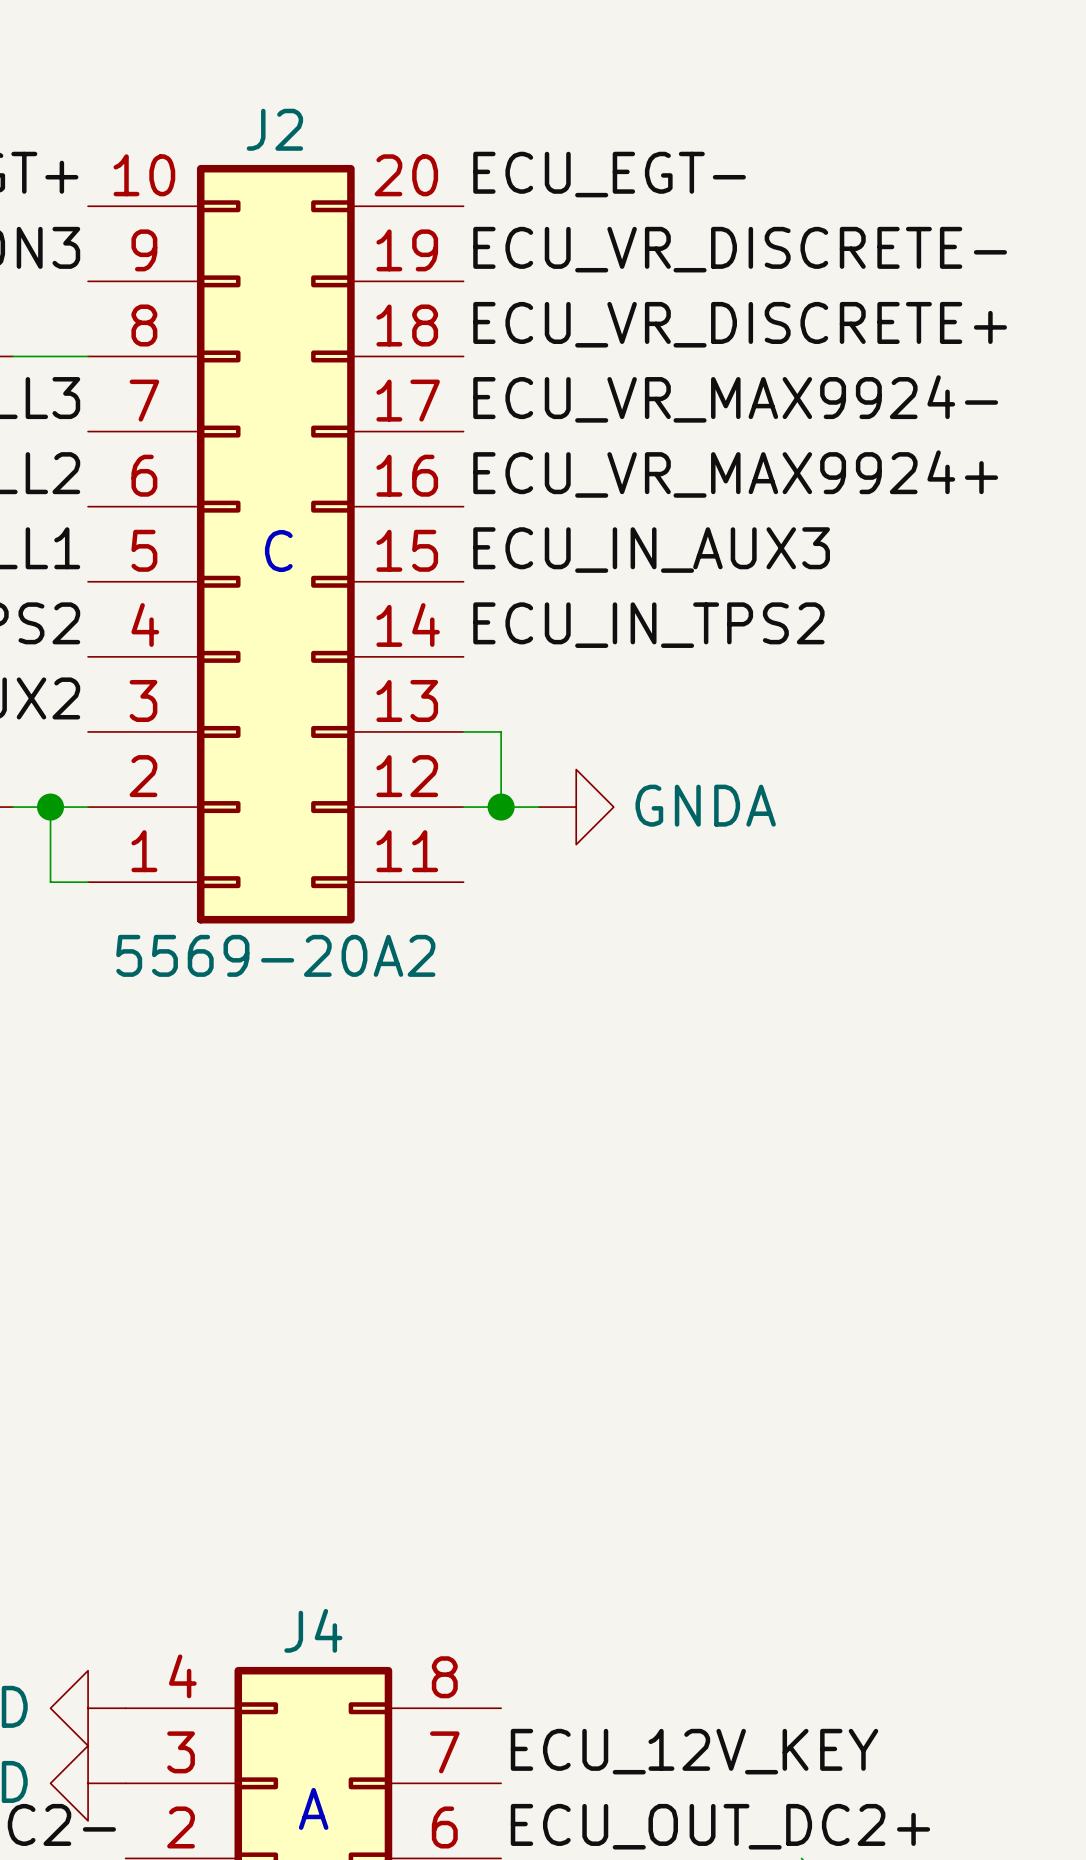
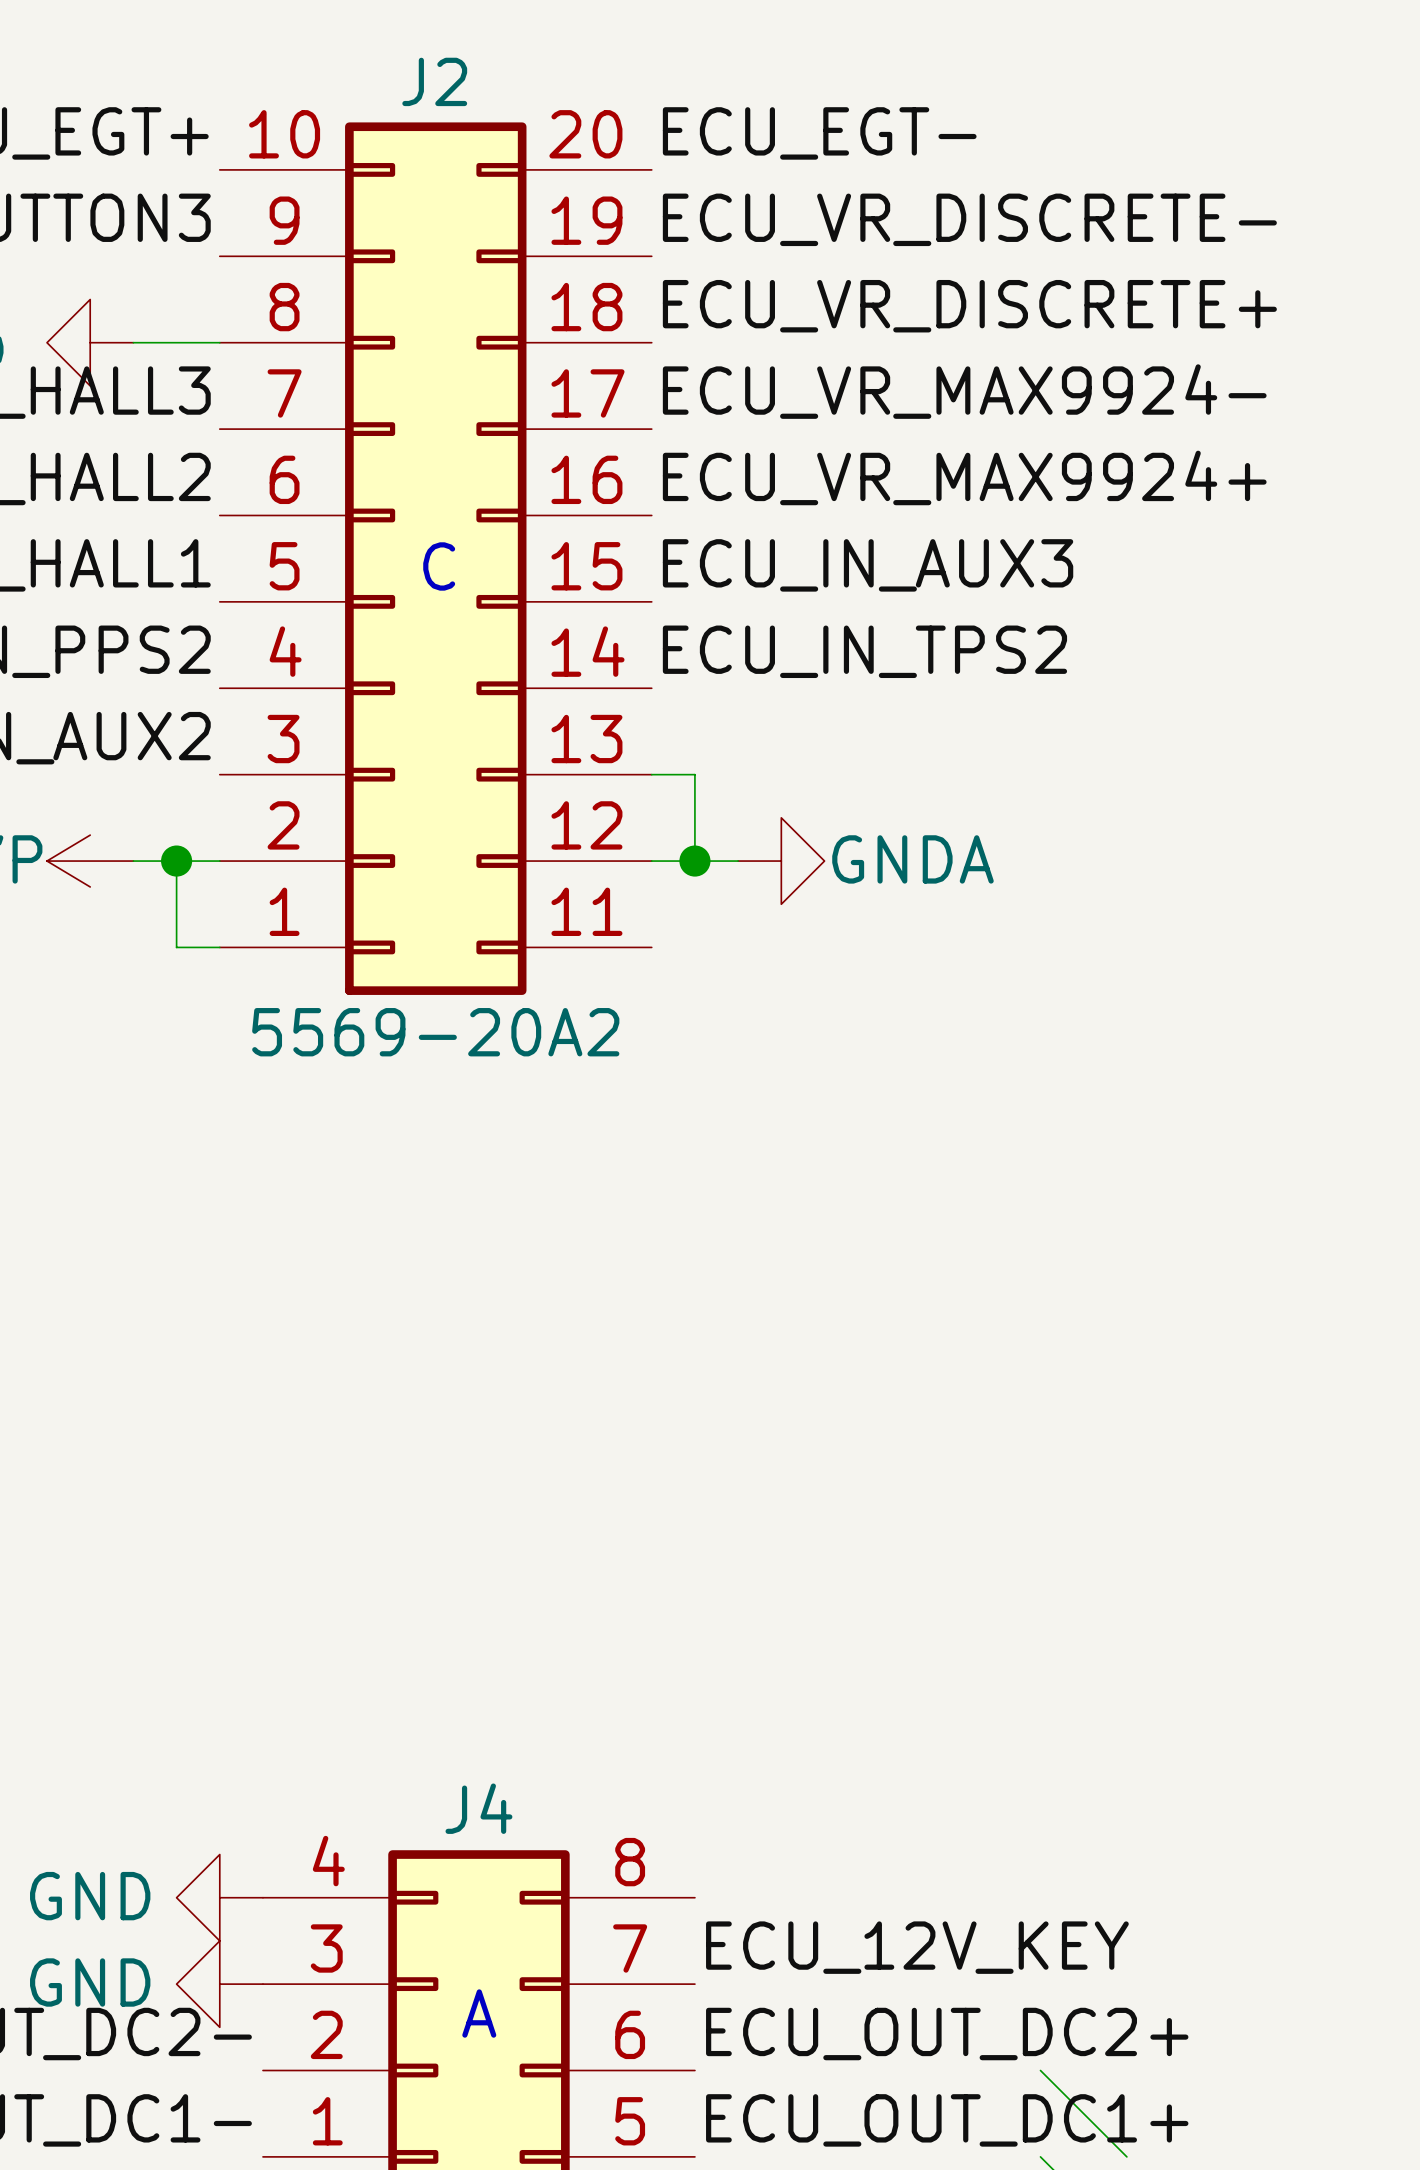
power symbol text position: GNDA (705, 805) -> GNDA (912, 859)

